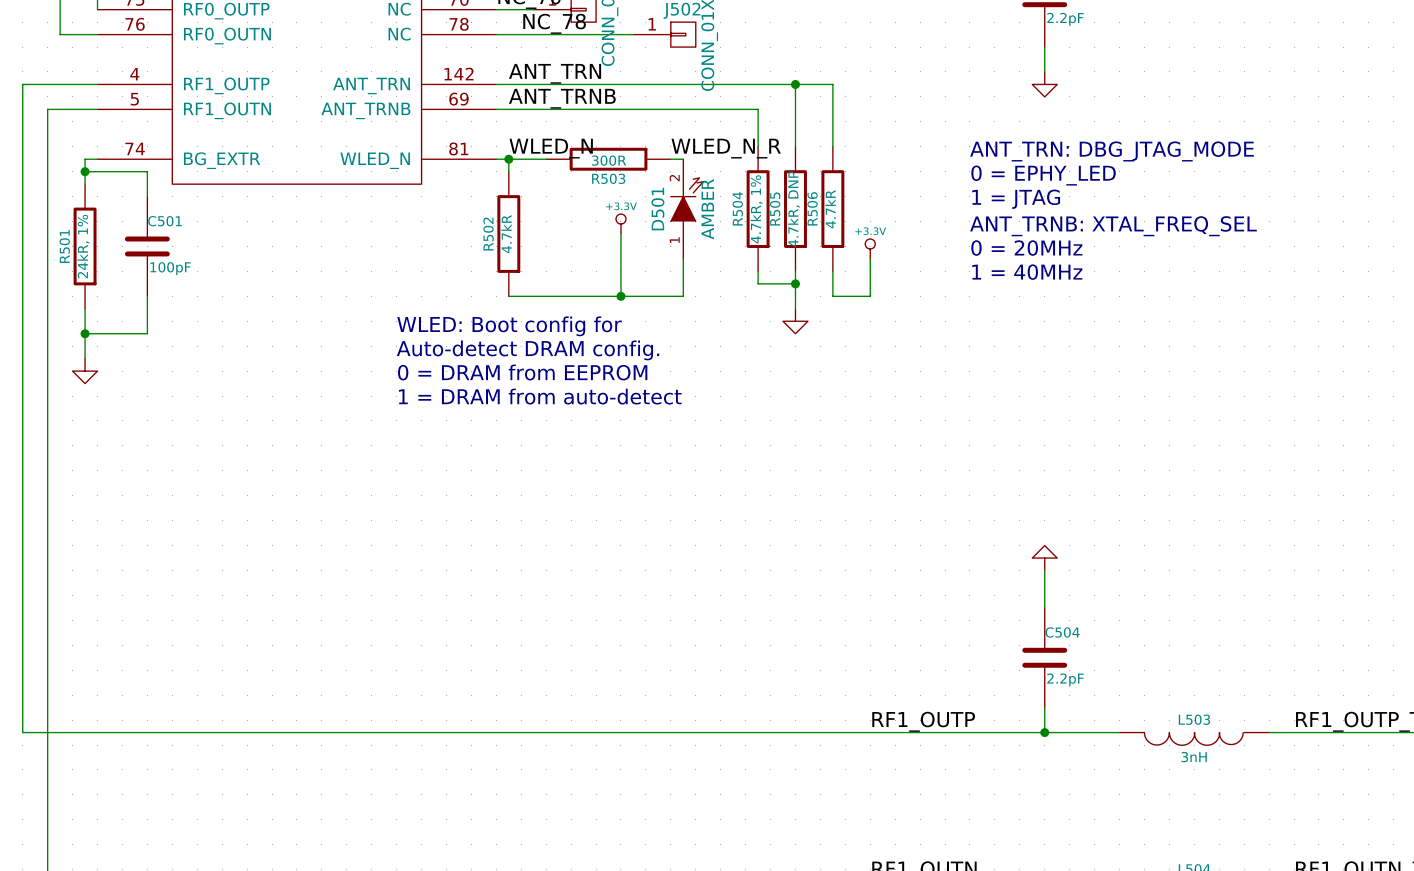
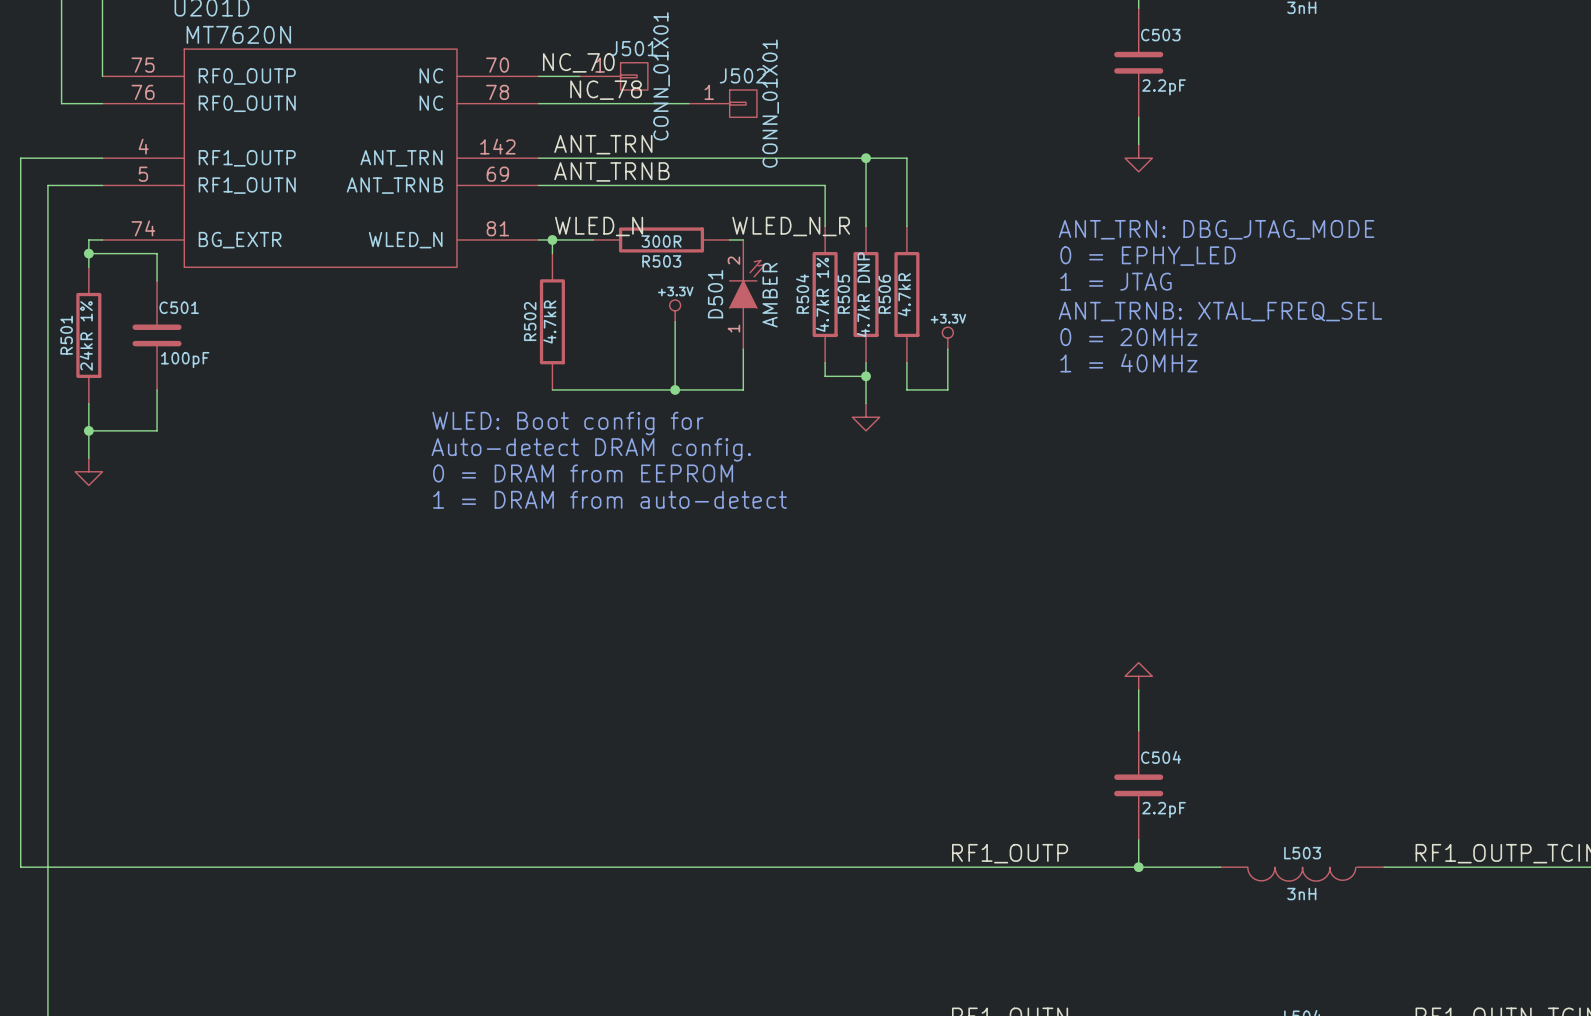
R504 value: 4.7kR, 1% (756, 209) -> 4.7kR 1% (822, 294)
R505 value: 4.7kR, DNP (793, 209) -> 4.7kR DNP (863, 294)
R501 value: 24kR, 1% (83, 246) -> 24kR 1% (86, 335)

